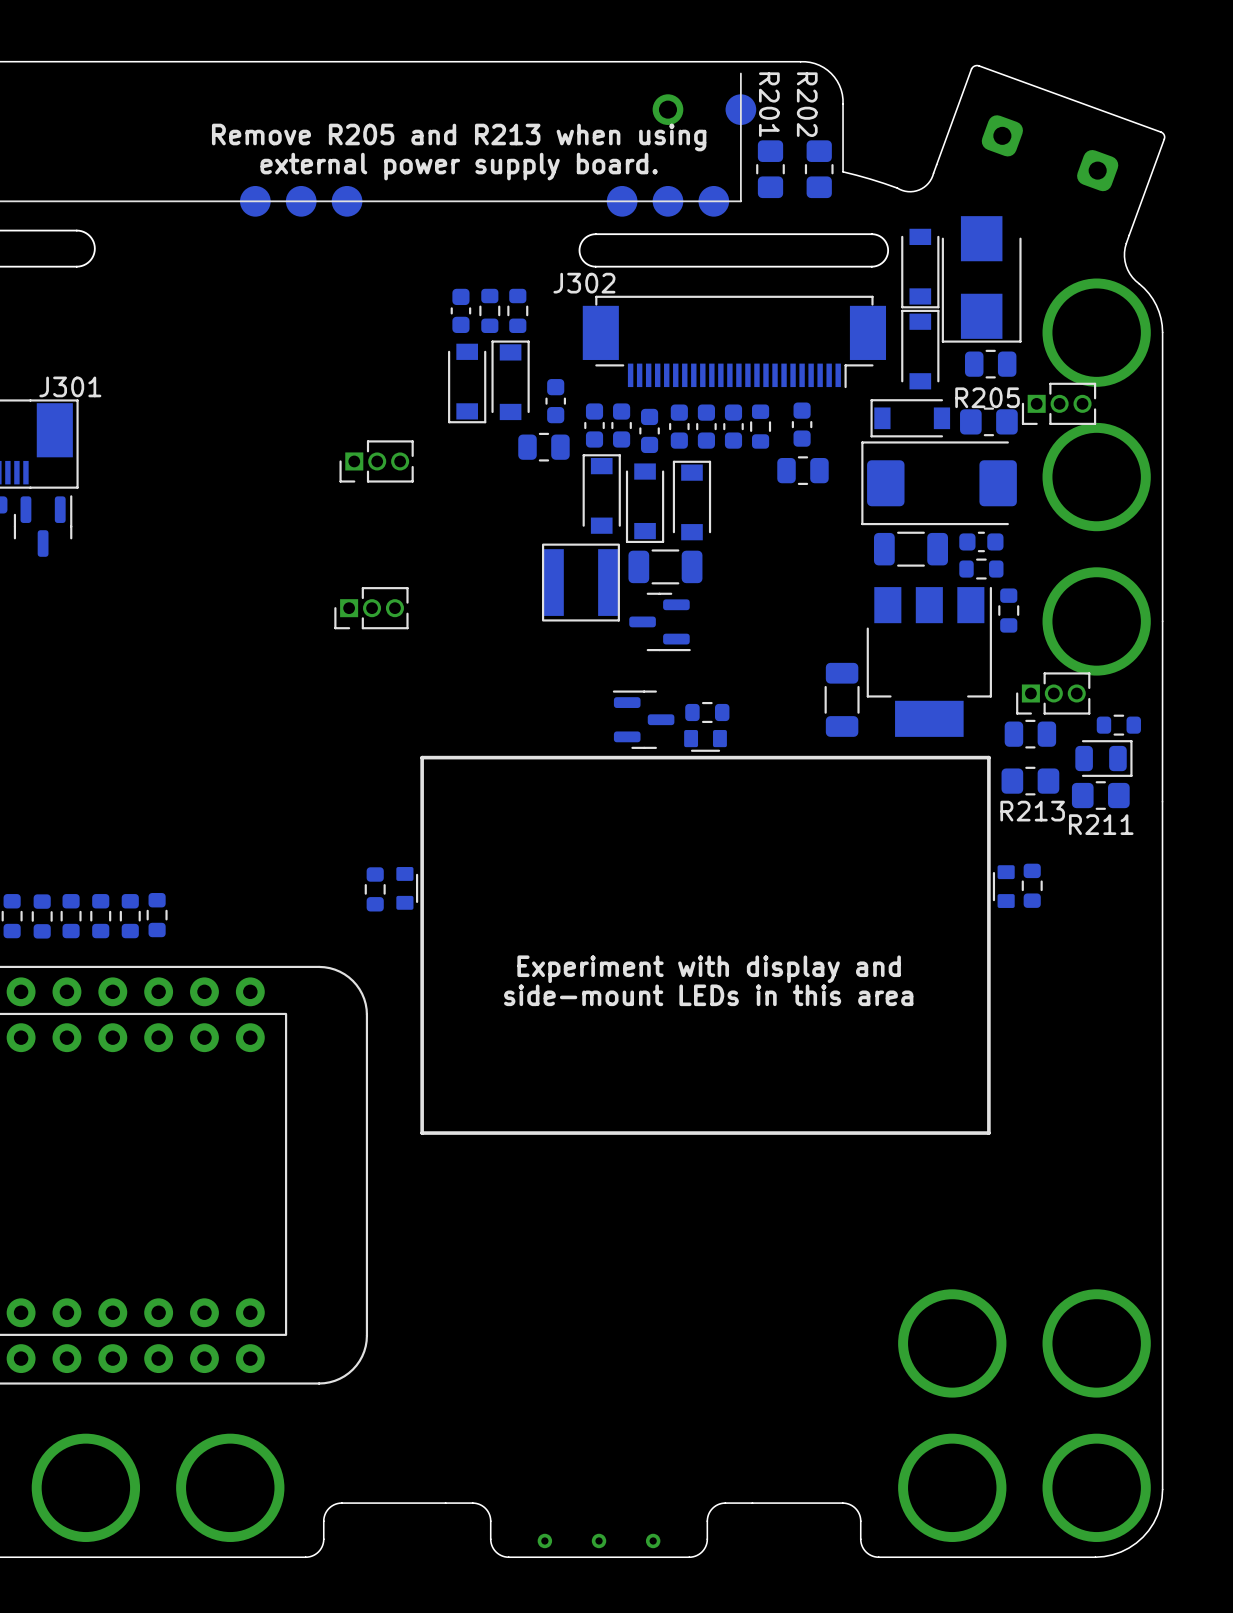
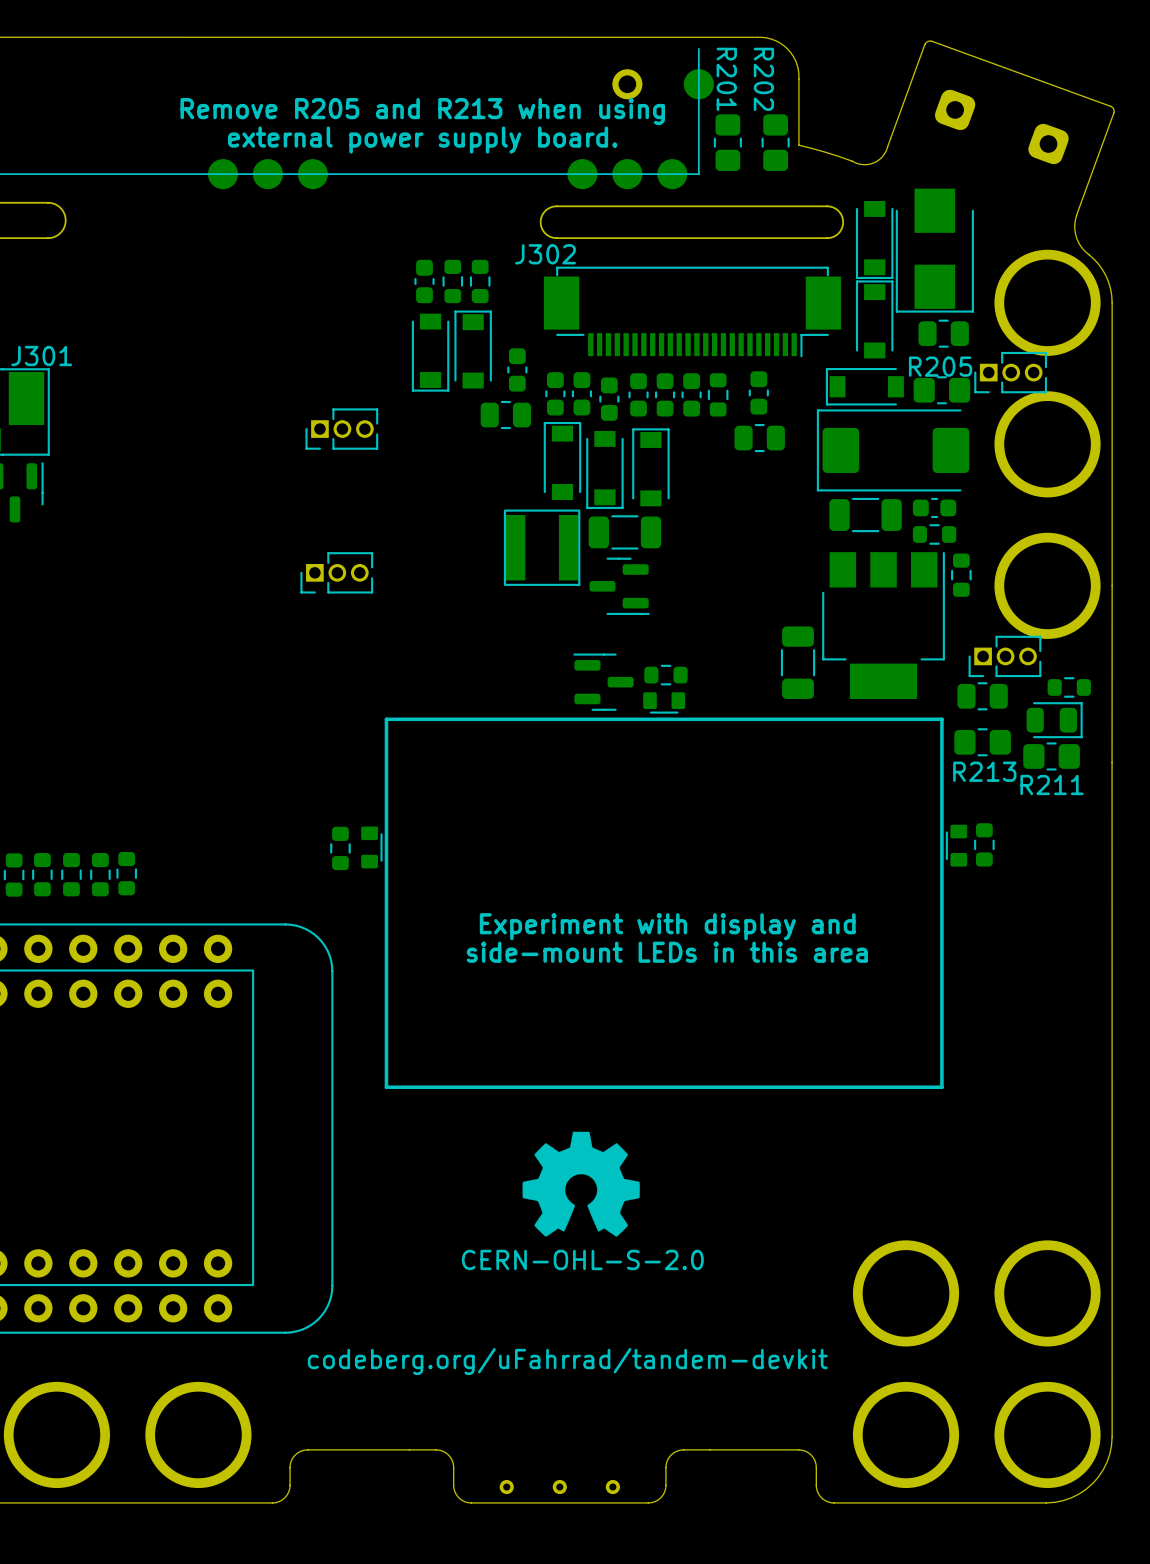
drawing: none -> [522, 1131, 640, 1237]
text: none -> CERN-OHL-S-2.0 (582, 1259)
text: none -> codeberg.org/uFahrrad/tandem-devkit (567, 1361)

